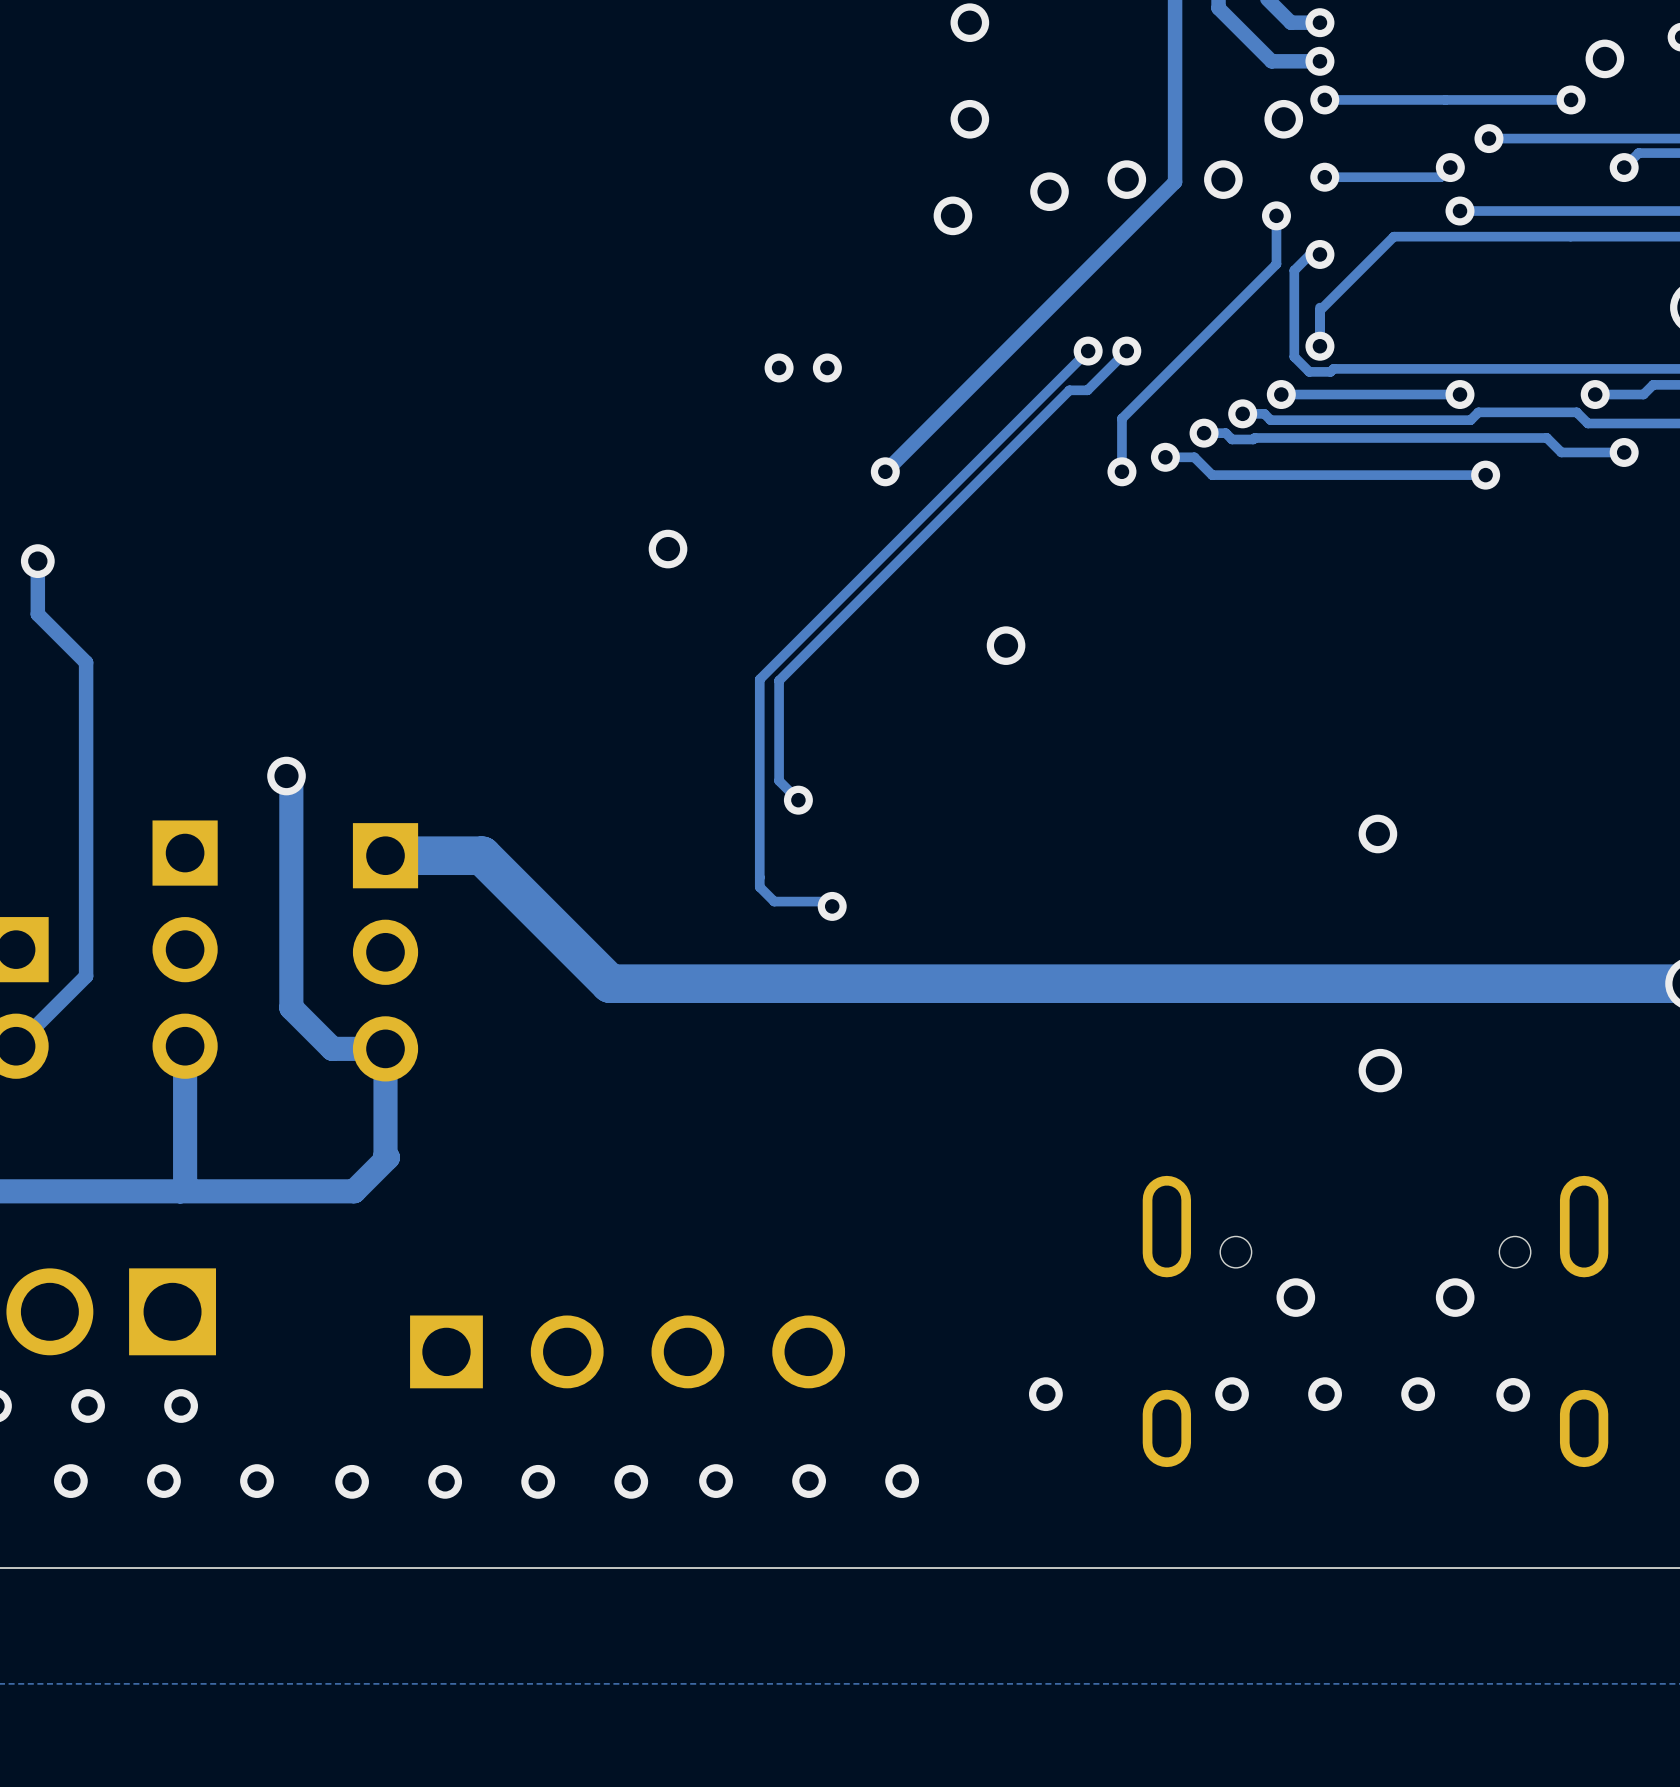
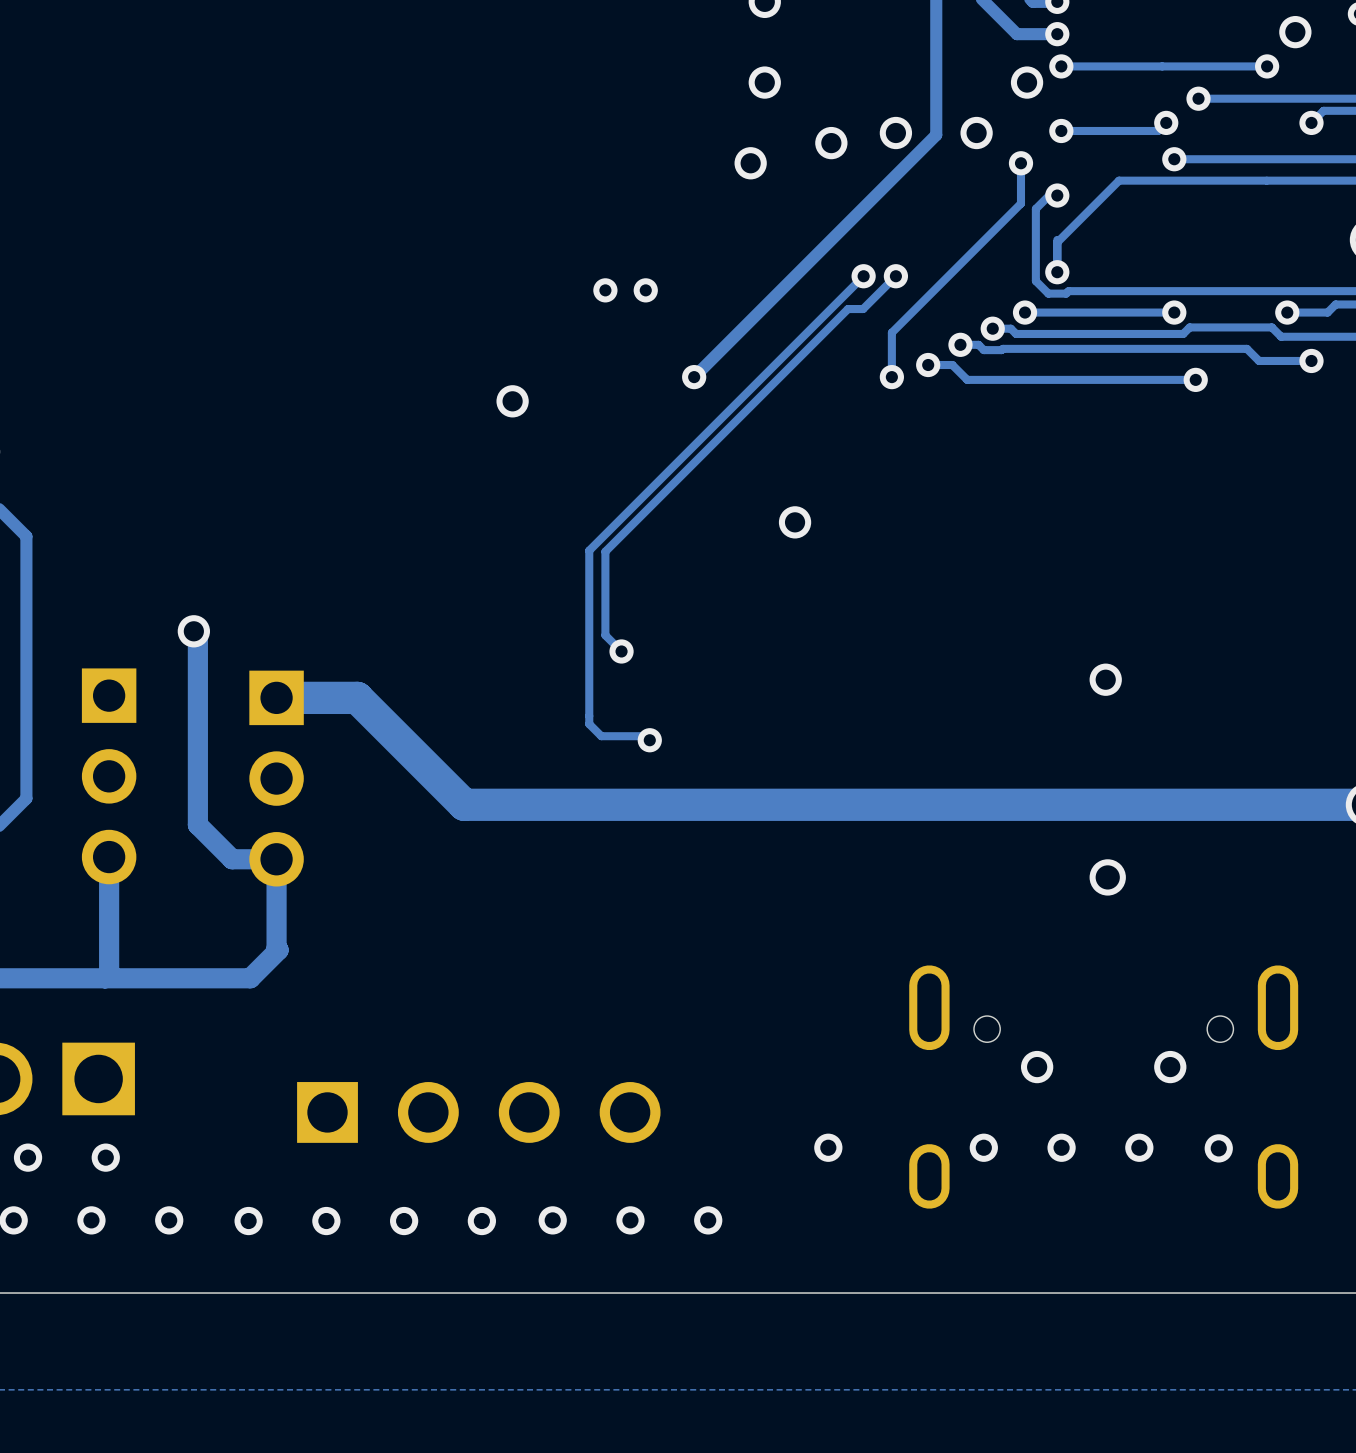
via position: (668, 549) -> (512, 401)

